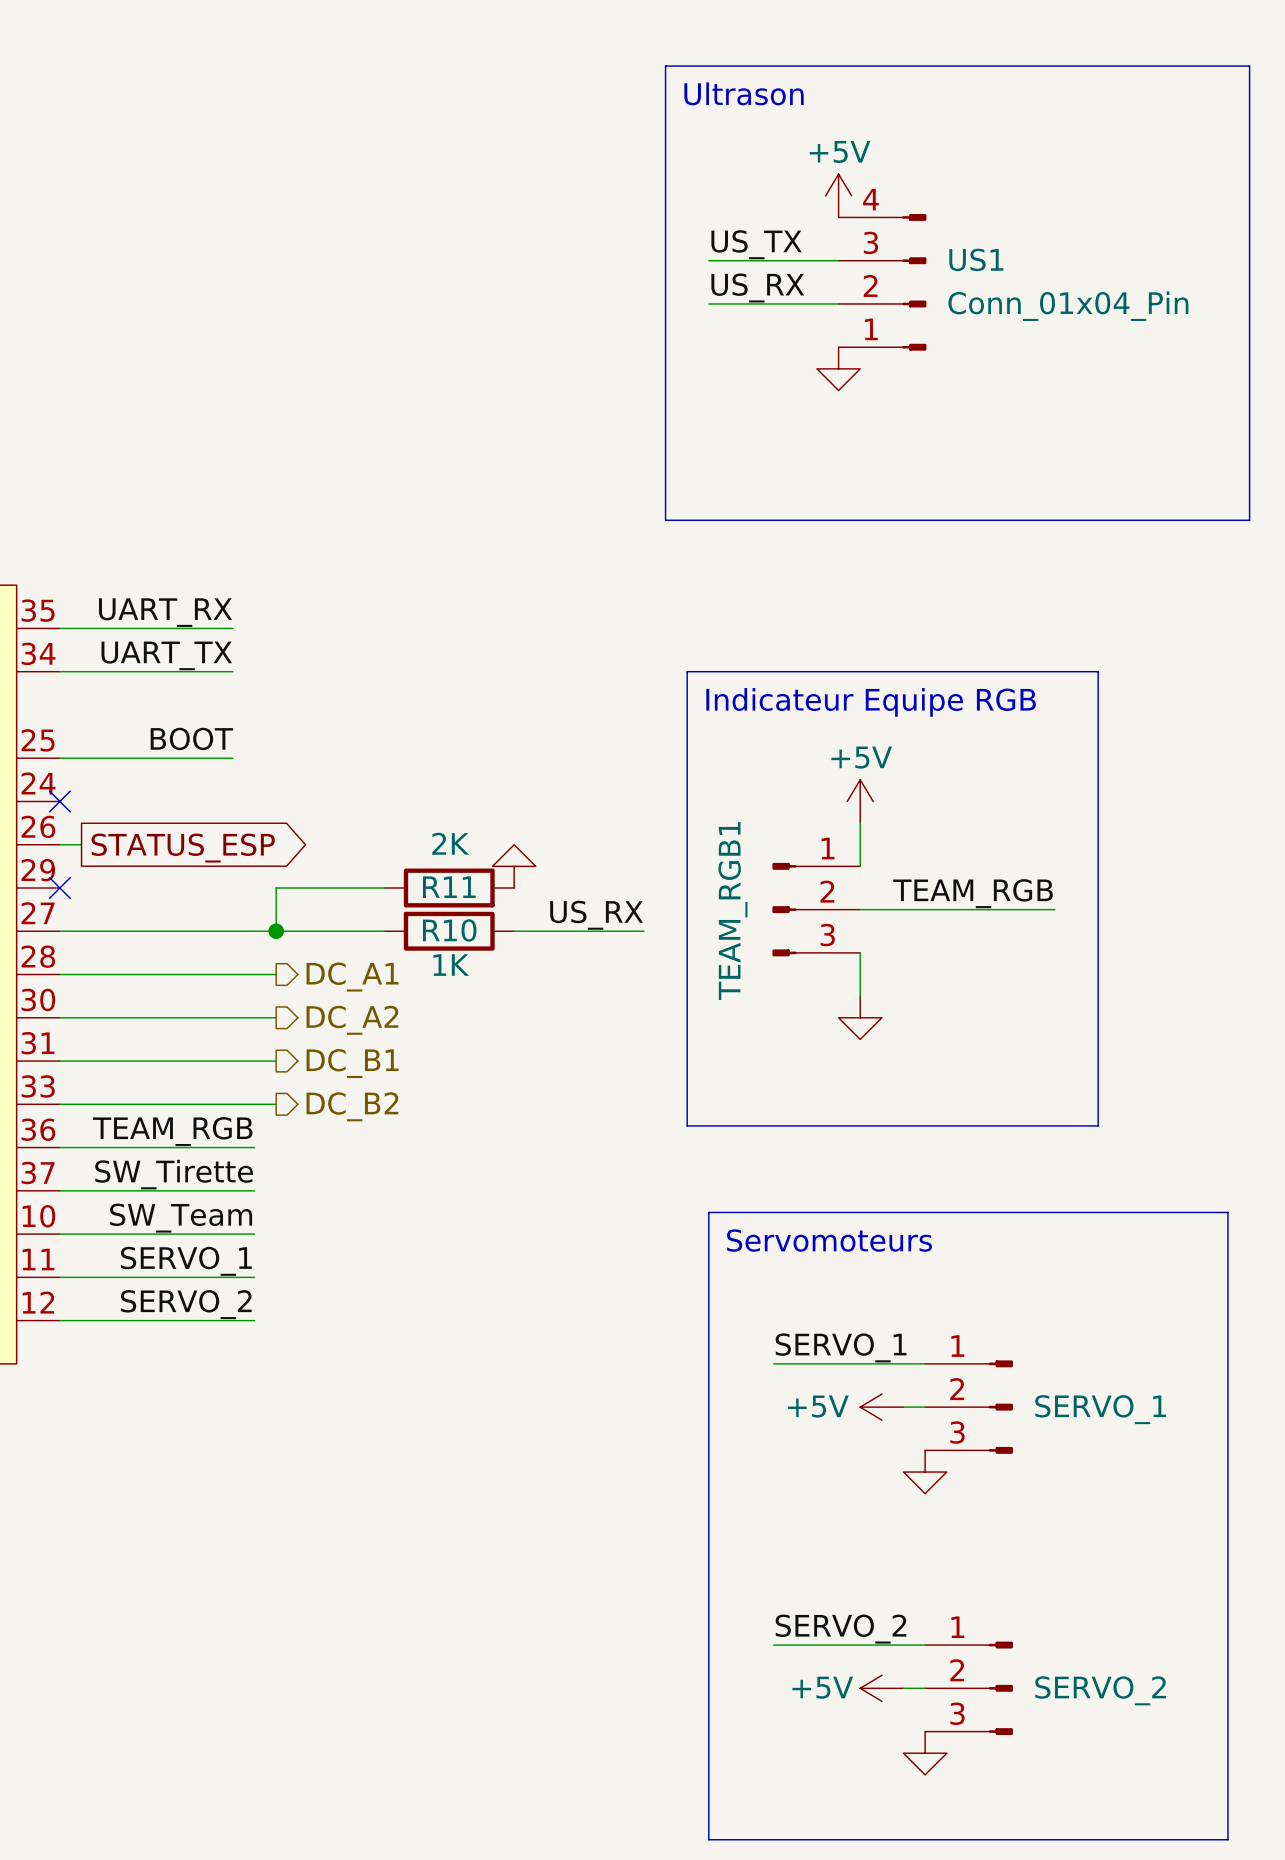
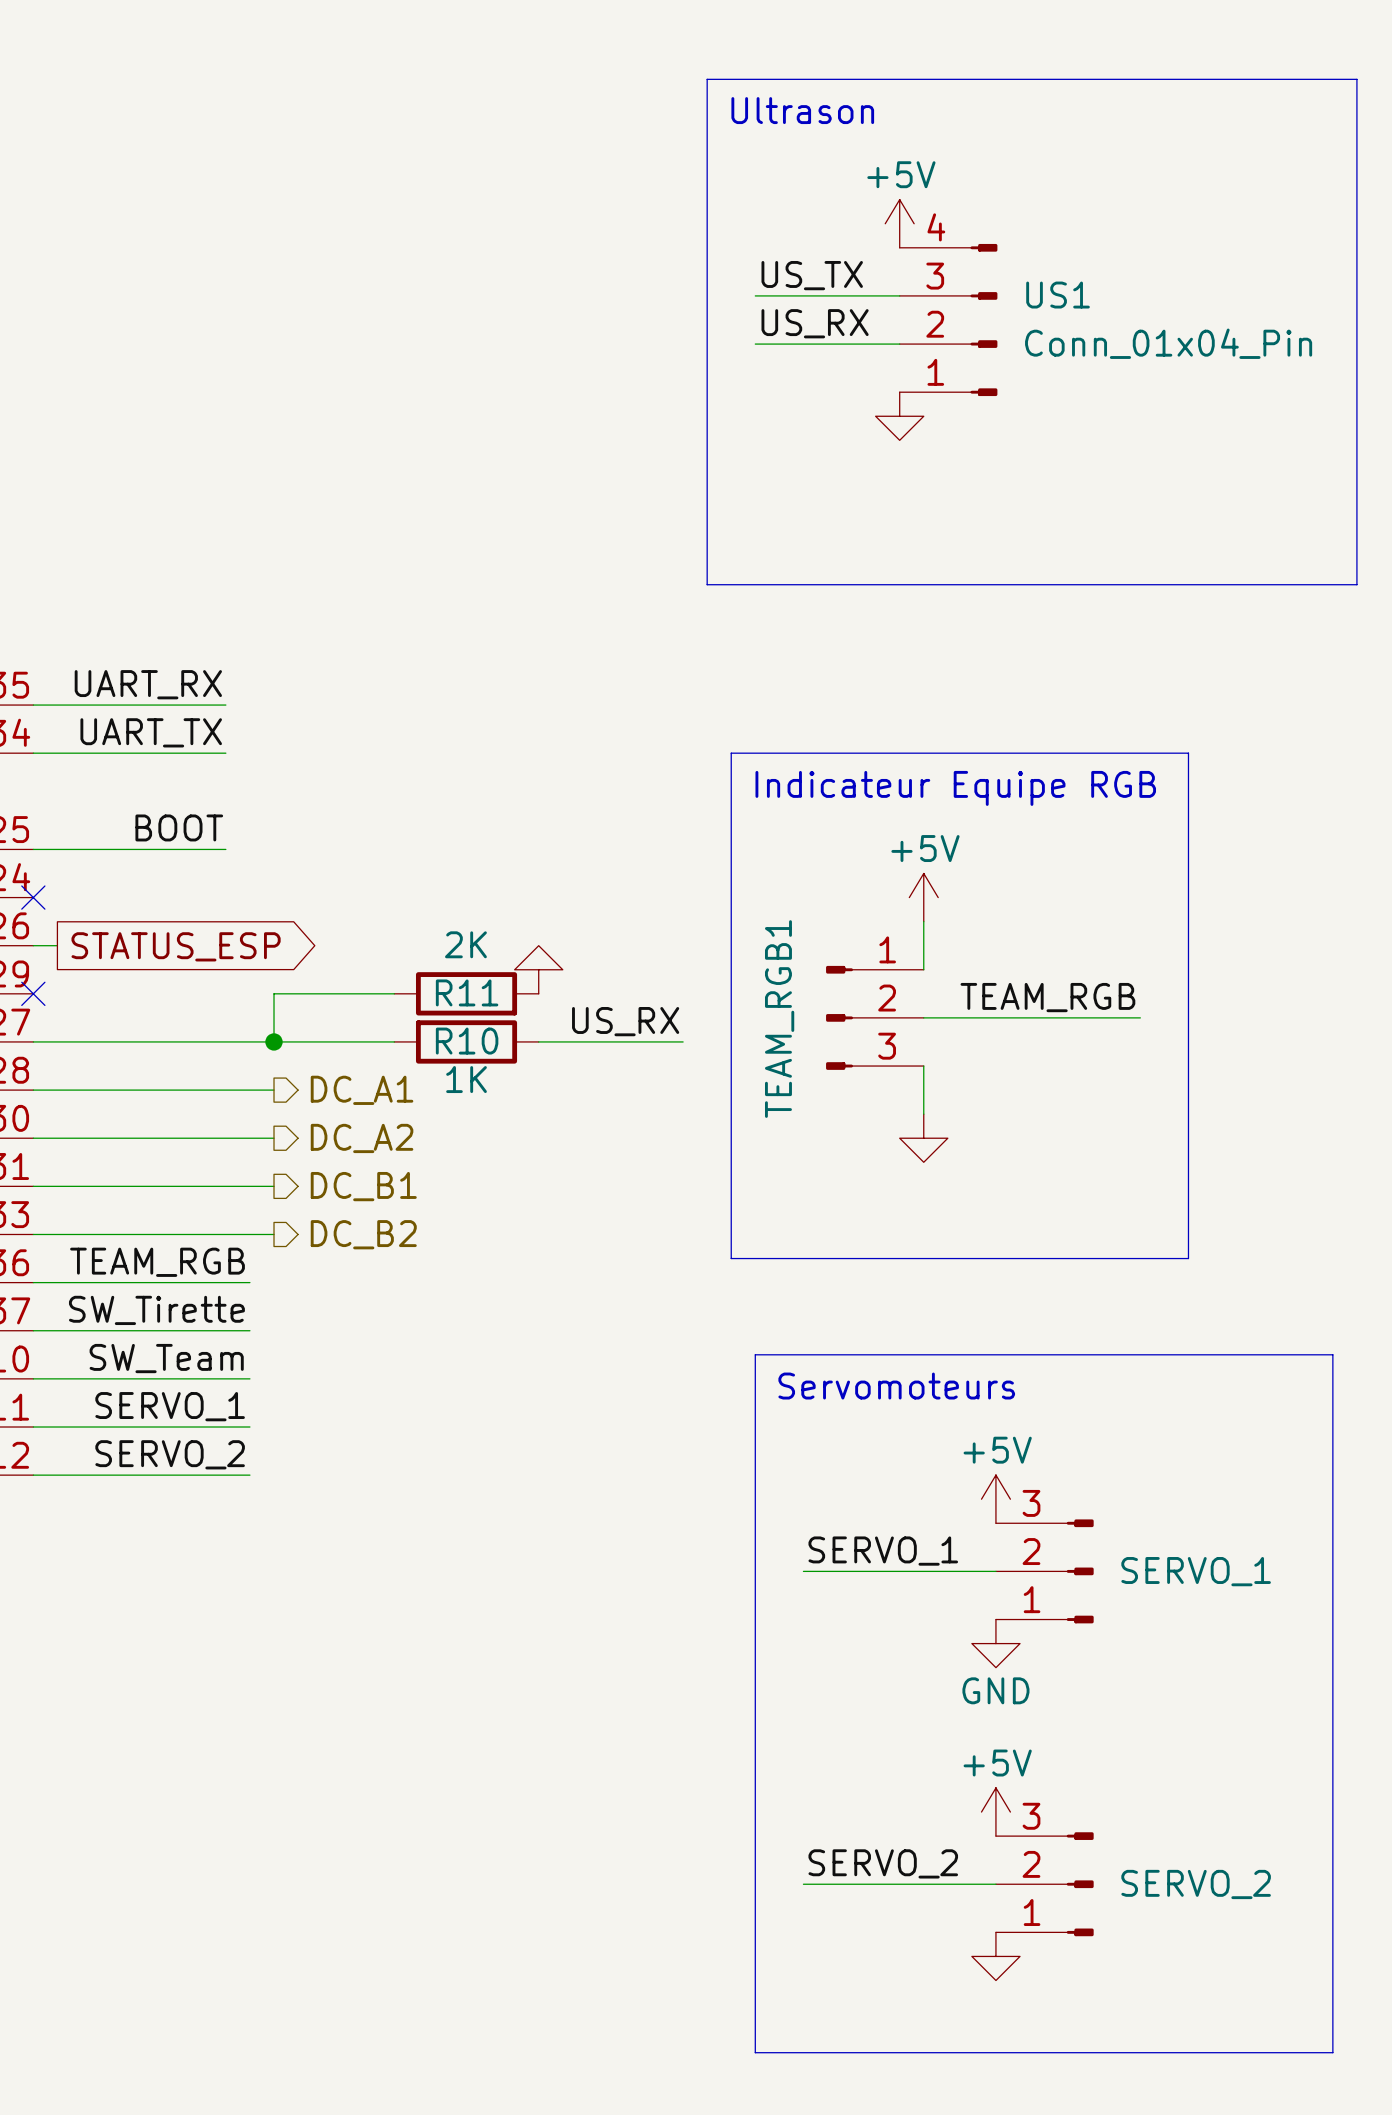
label position: SERVO_1 (841, 1347) -> SERVO_1 (883, 1551)
wire: (773, 1363) (925, 1363) -> (803, 1571) (971, 1571)
power symbol rotation: 0° (881, 1407) -> 90° clockwise (995, 1499)
power symbol position: +5V (881, 1407) -> +5V (995, 1499)
SERVO_1 flip: as is (1000, 1407) -> up-down (1080, 1571)
power symbol text: none -> GND (995, 1690)
label position: SERVO_2 (840, 1629) -> SERVO_2 (883, 1863)
wire: (773, 1645) (925, 1645) -> (803, 1884) (971, 1884)
power symbol rotation: 0° (881, 1688) -> 90° clockwise (995, 1812)
power symbol position: +5V (881, 1688) -> +5V (995, 1812)
SERVO_2 flip: as is (1000, 1688) -> up-down (1080, 1884)

